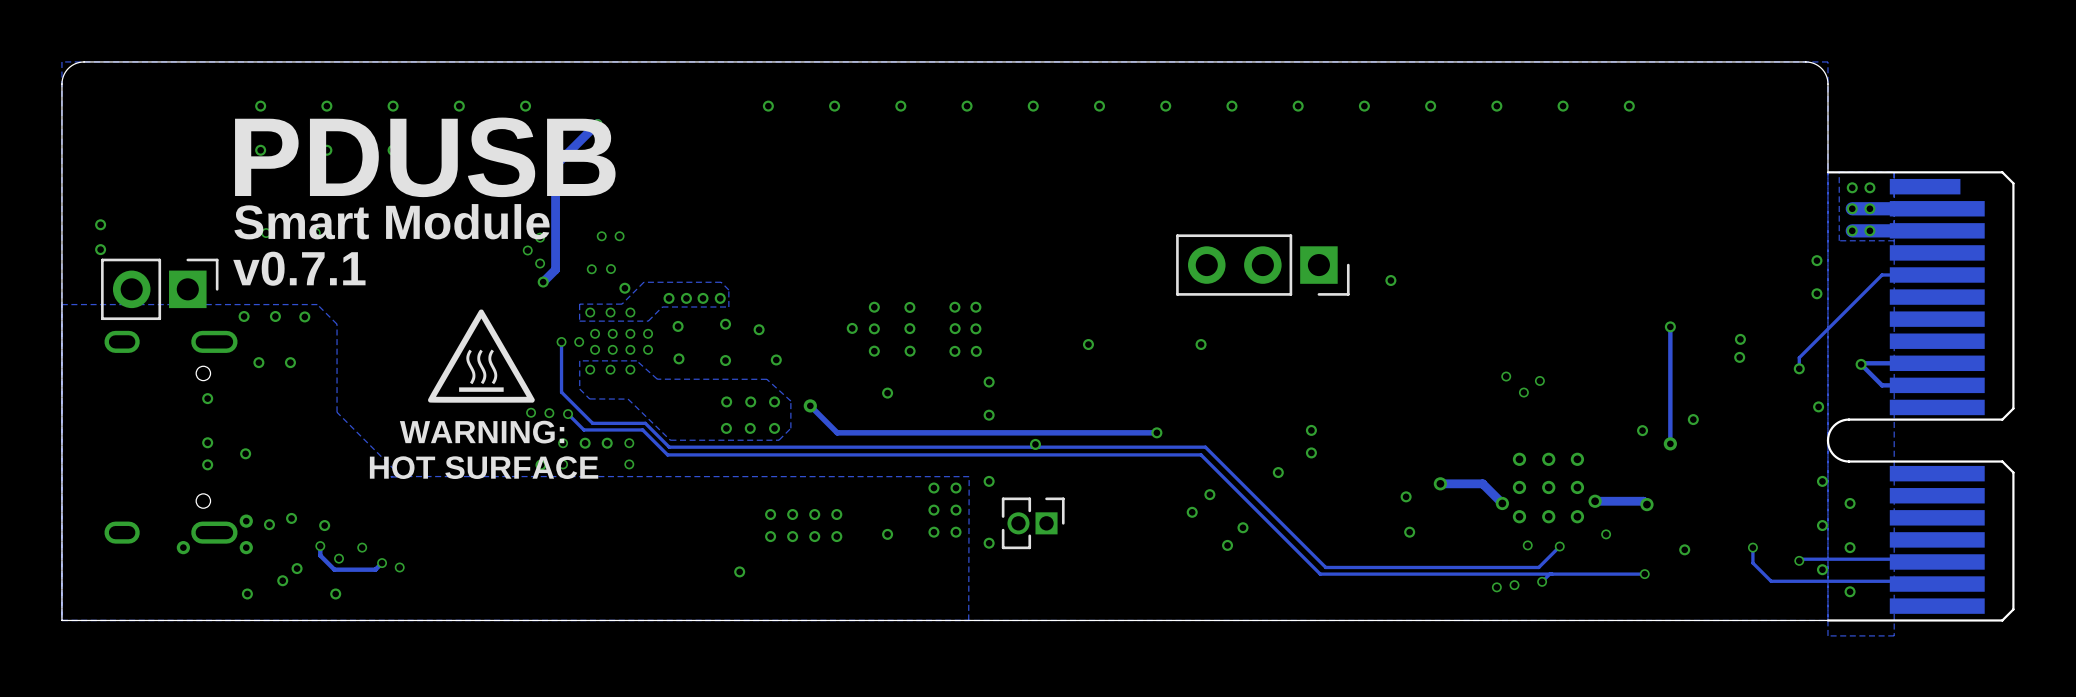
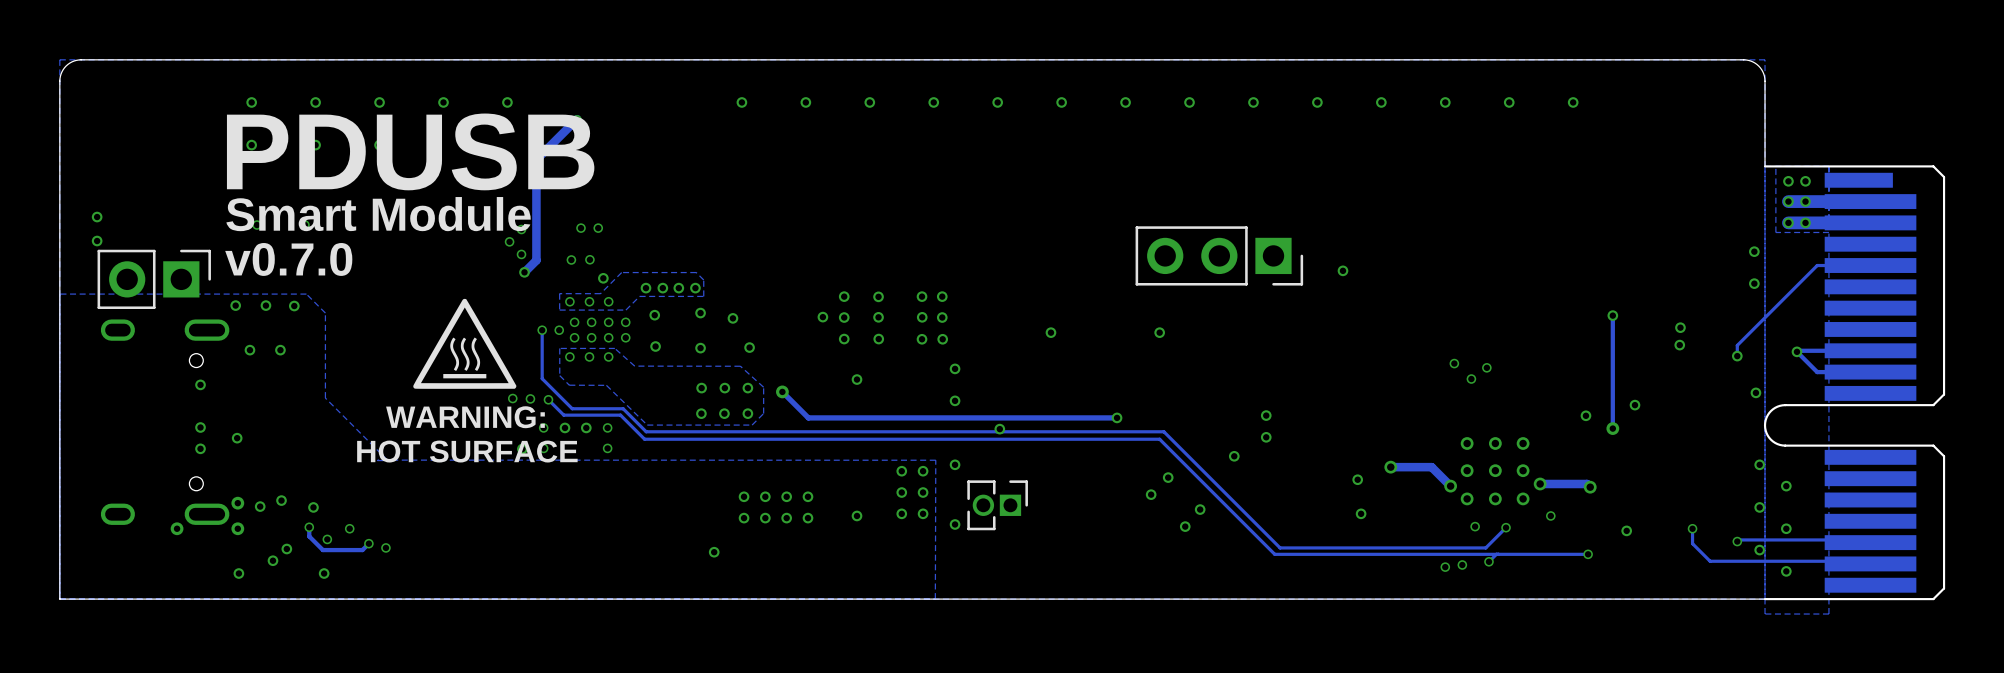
text: v0.7.1 (299, 268) -> v0.7.0 (288, 259)

